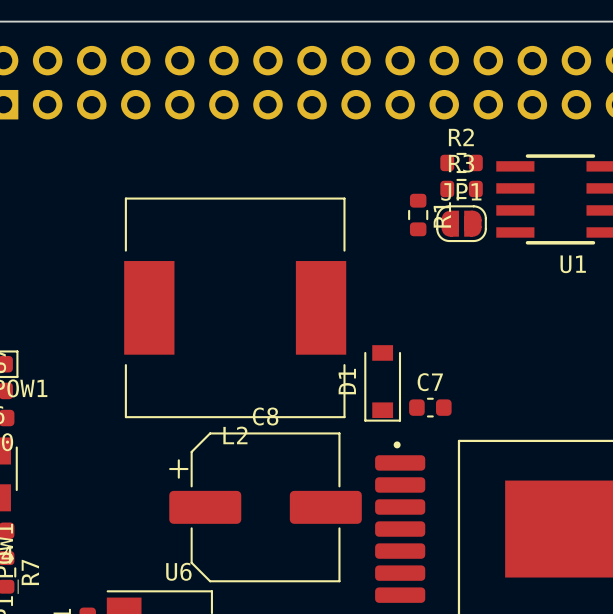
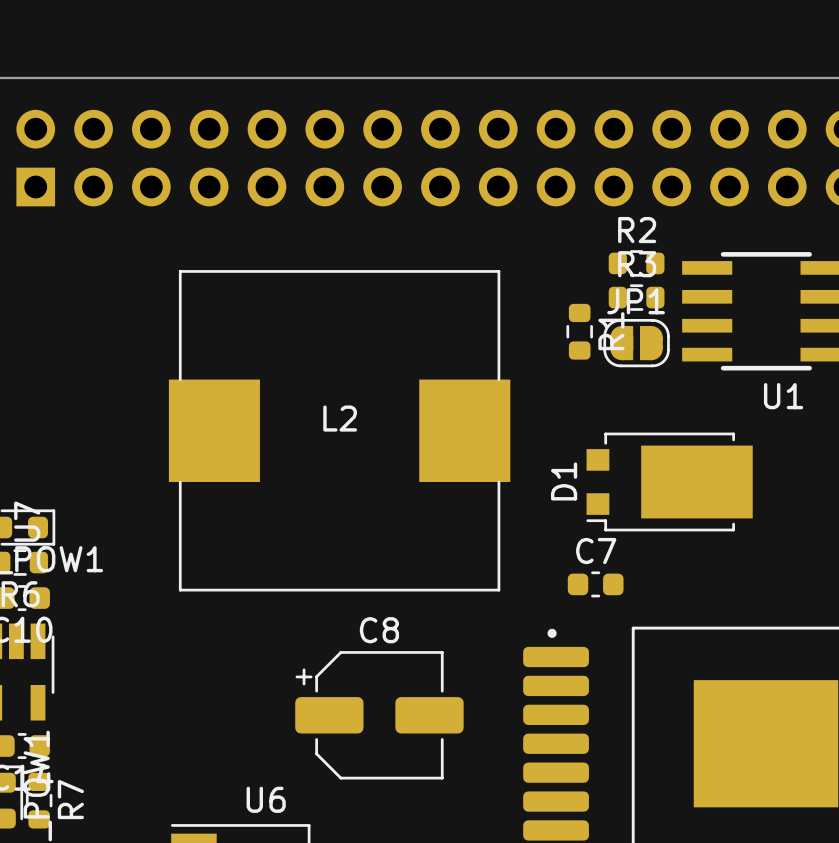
L2 footprint: [124, 197, 347, 419] -> [168, 270, 511, 592]
D1 footprint: [364, 345, 402, 422] -> [586, 432, 753, 532]
D1 name position: D1 (347, 381) -> D1 (564, 481)
C8 footprint: [169, 432, 362, 583] -> [295, 651, 464, 780]
L2 name position: L2 (235, 435) -> L2 (340, 418)

